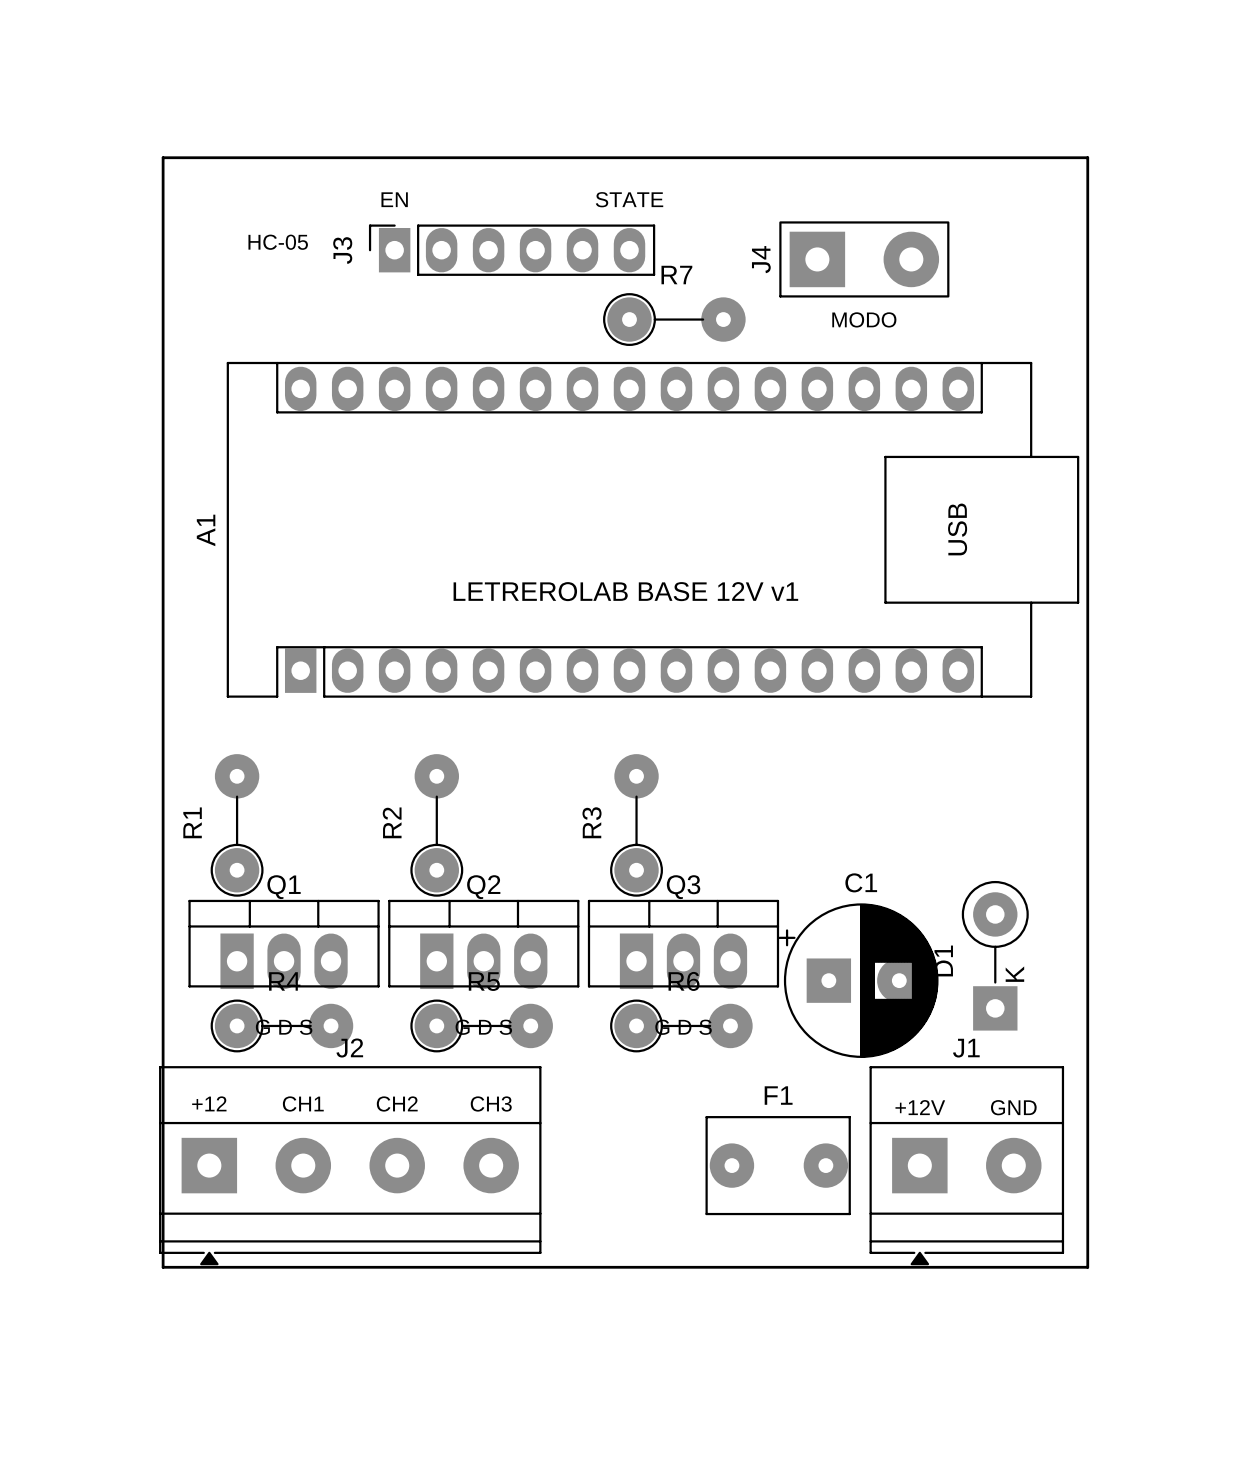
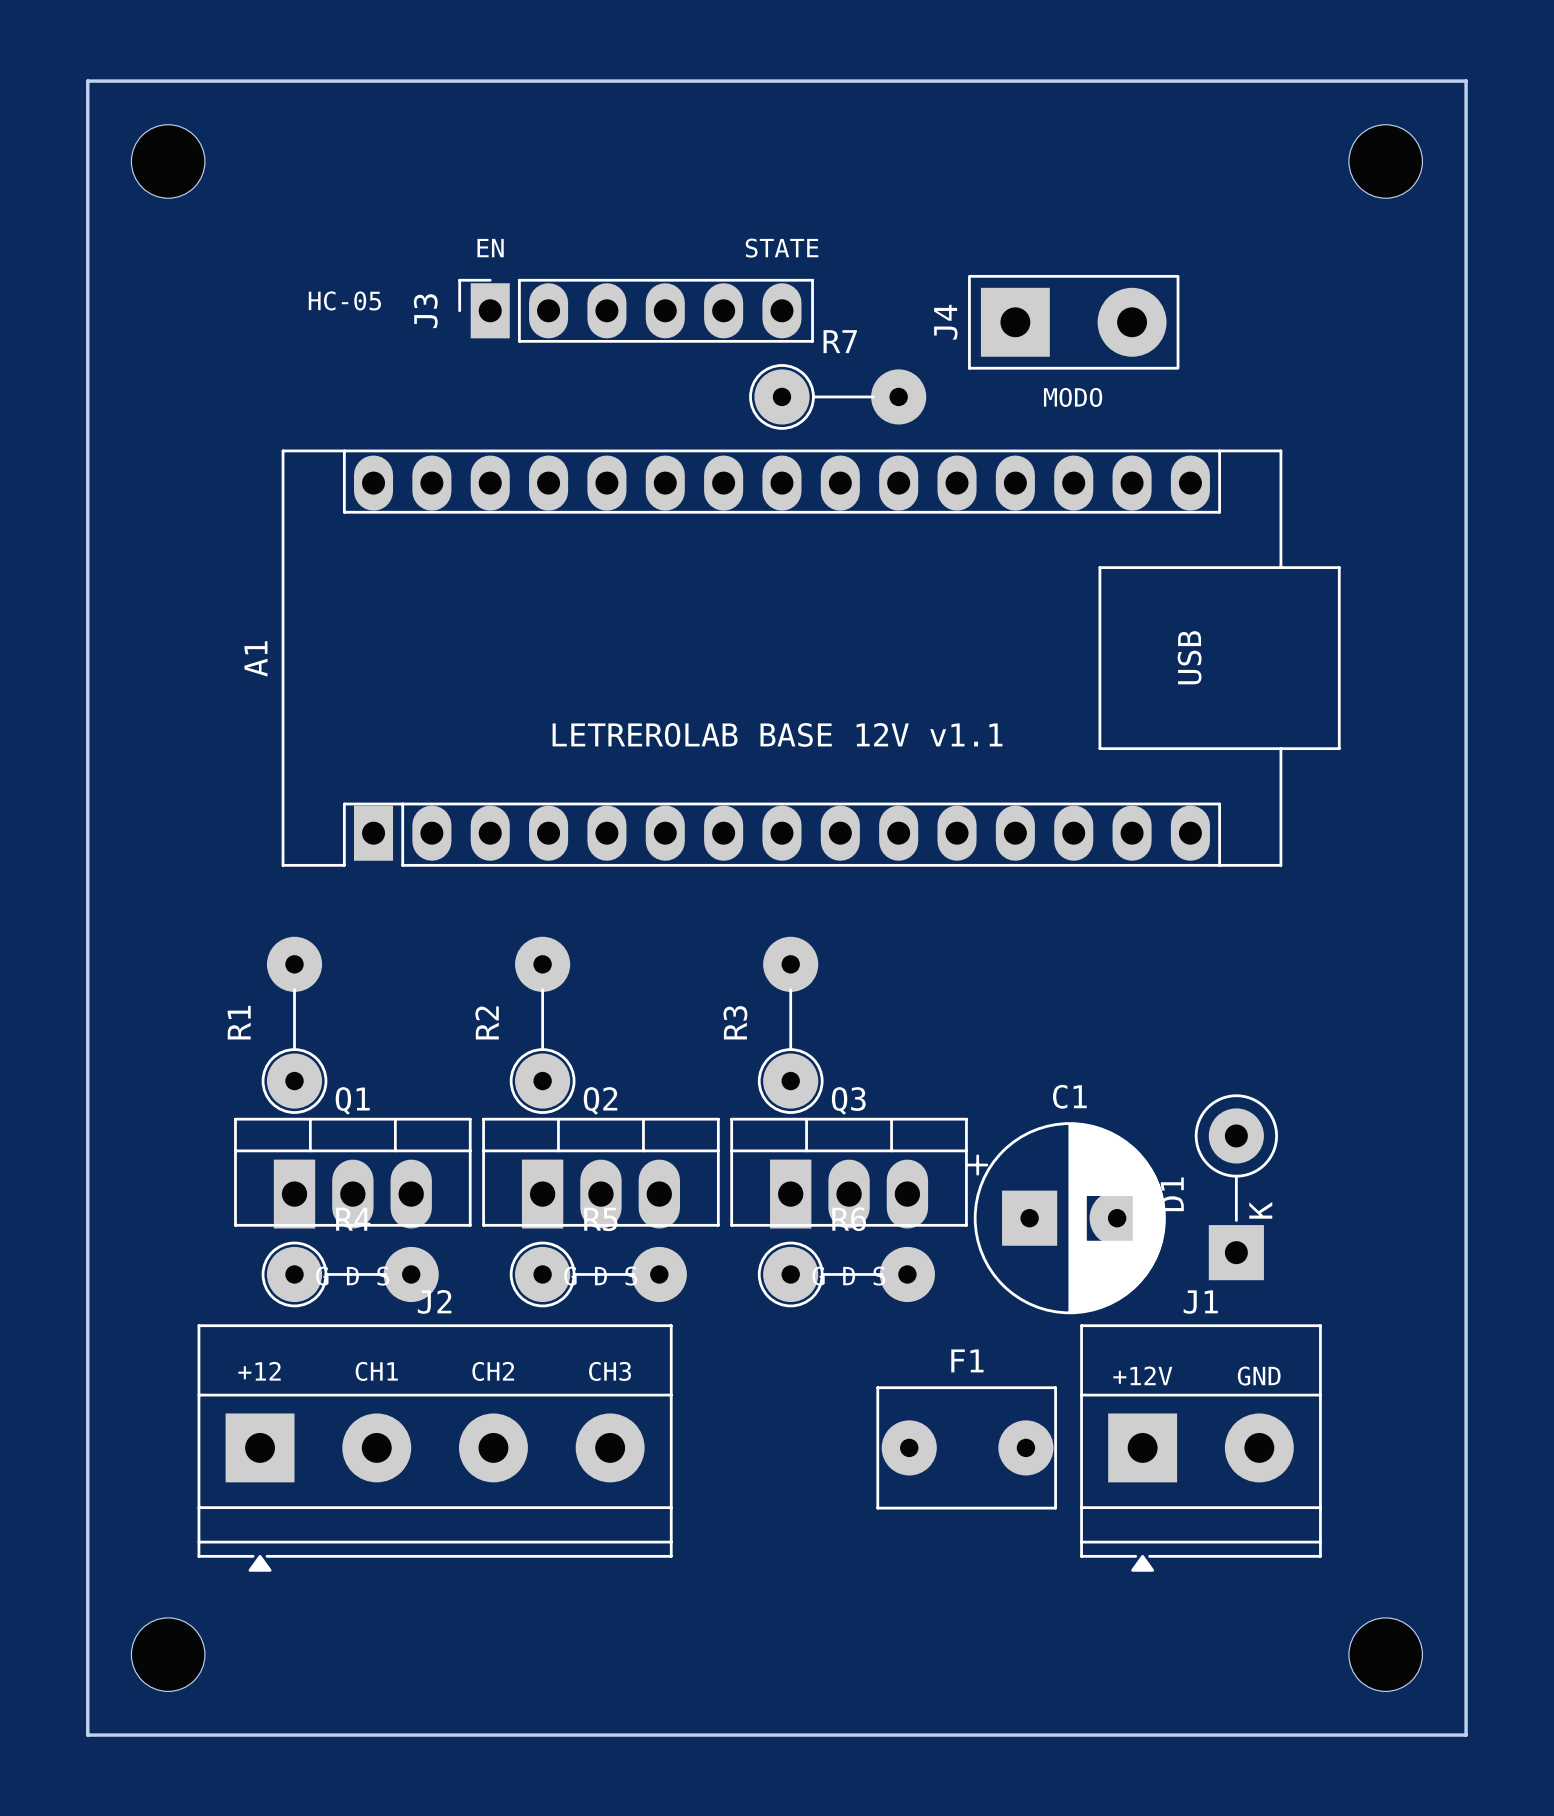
part: none -> (168, 161)
part: none -> (1385, 161)
board edge: (163, 157) (1087, 157) (1087, 1267) (163, 1267) (163, 157) -> (87, 81) (87, 1735) (1466, 1735) (1466, 81) (87, 81)
text: LETREROLAB BASE 12V v1 (625, 591) -> LETREROLAB BASE 12V v1.1 (777, 734)
part: none -> (168, 1654)
part: none -> (1385, 1654)

